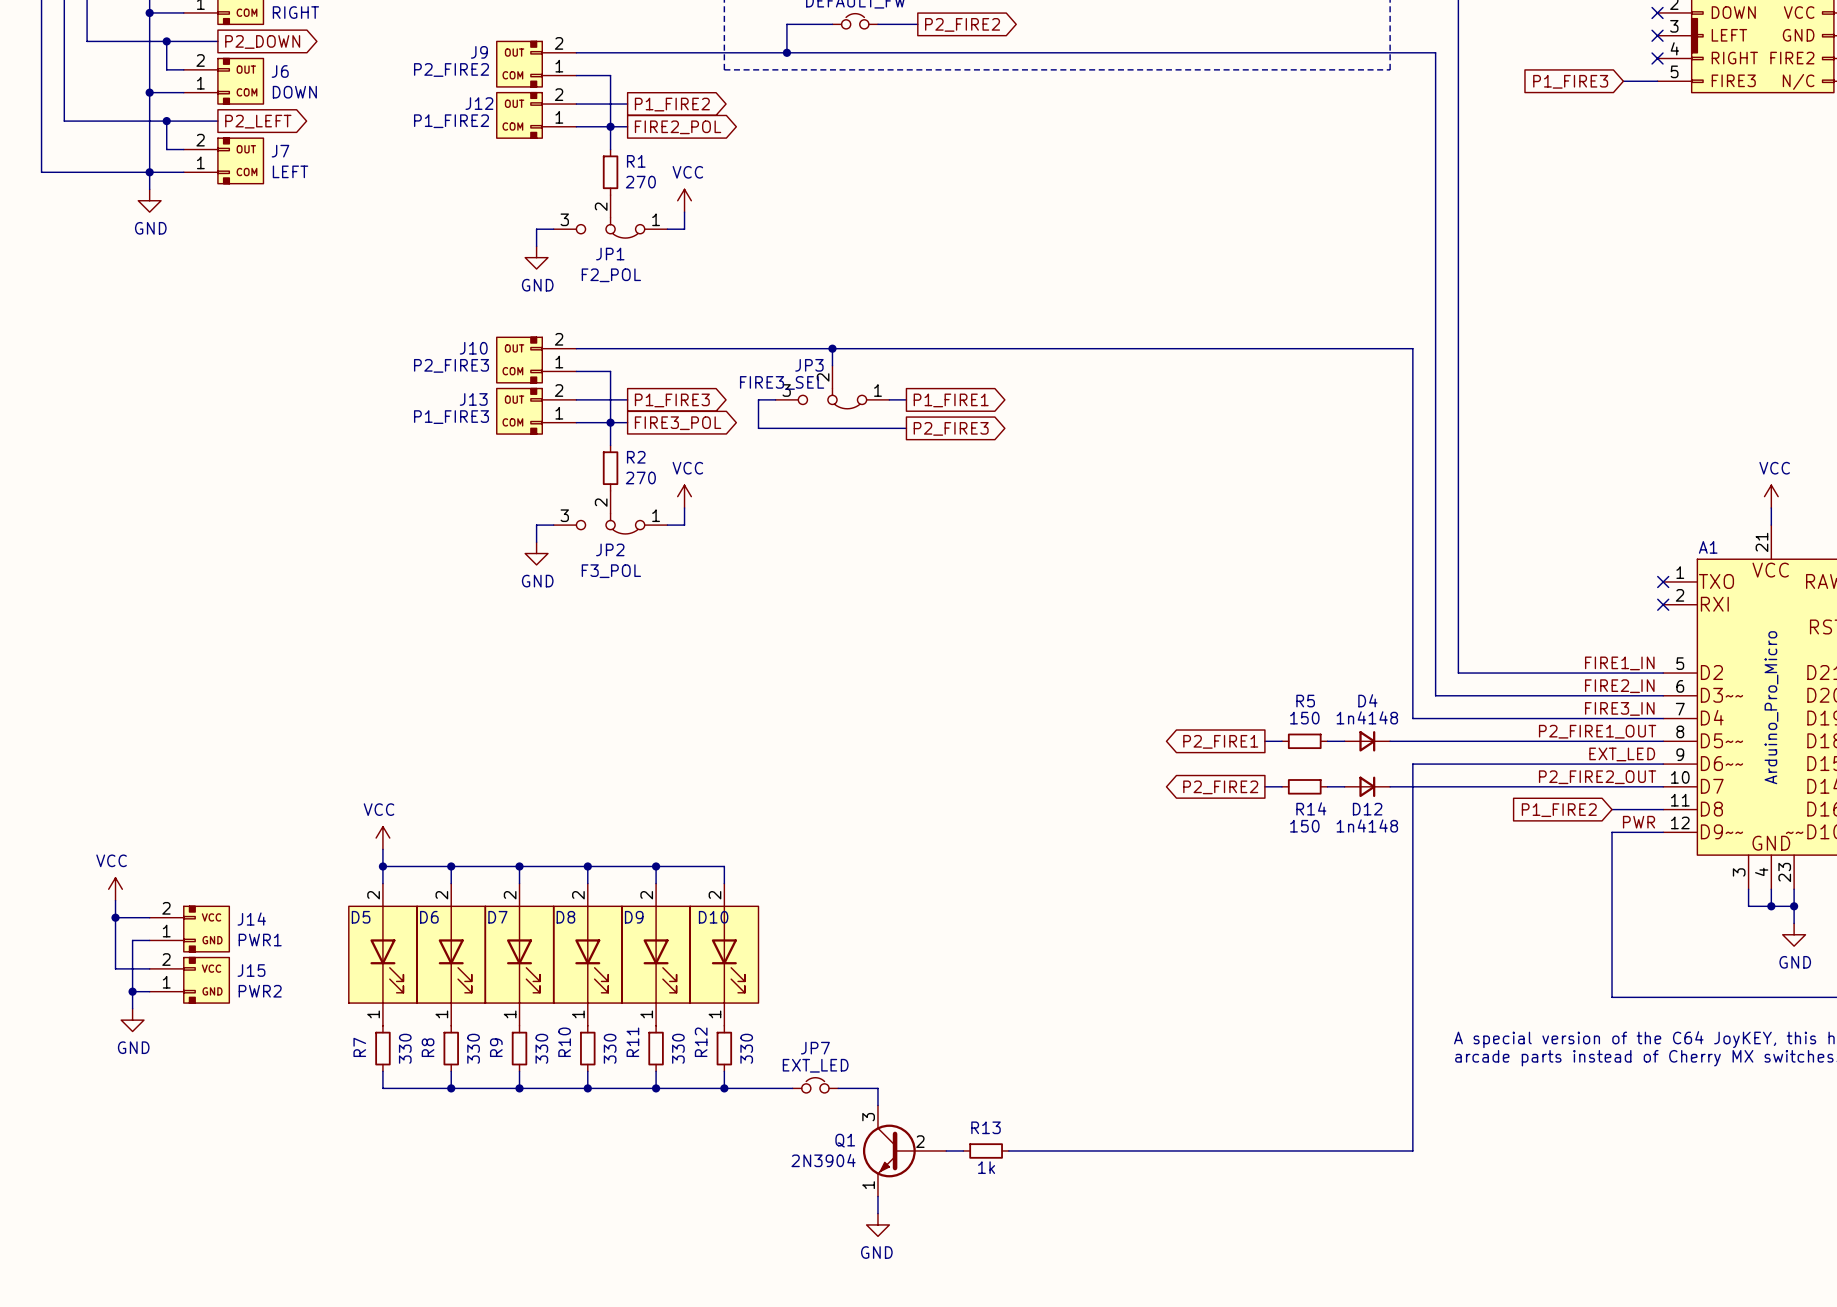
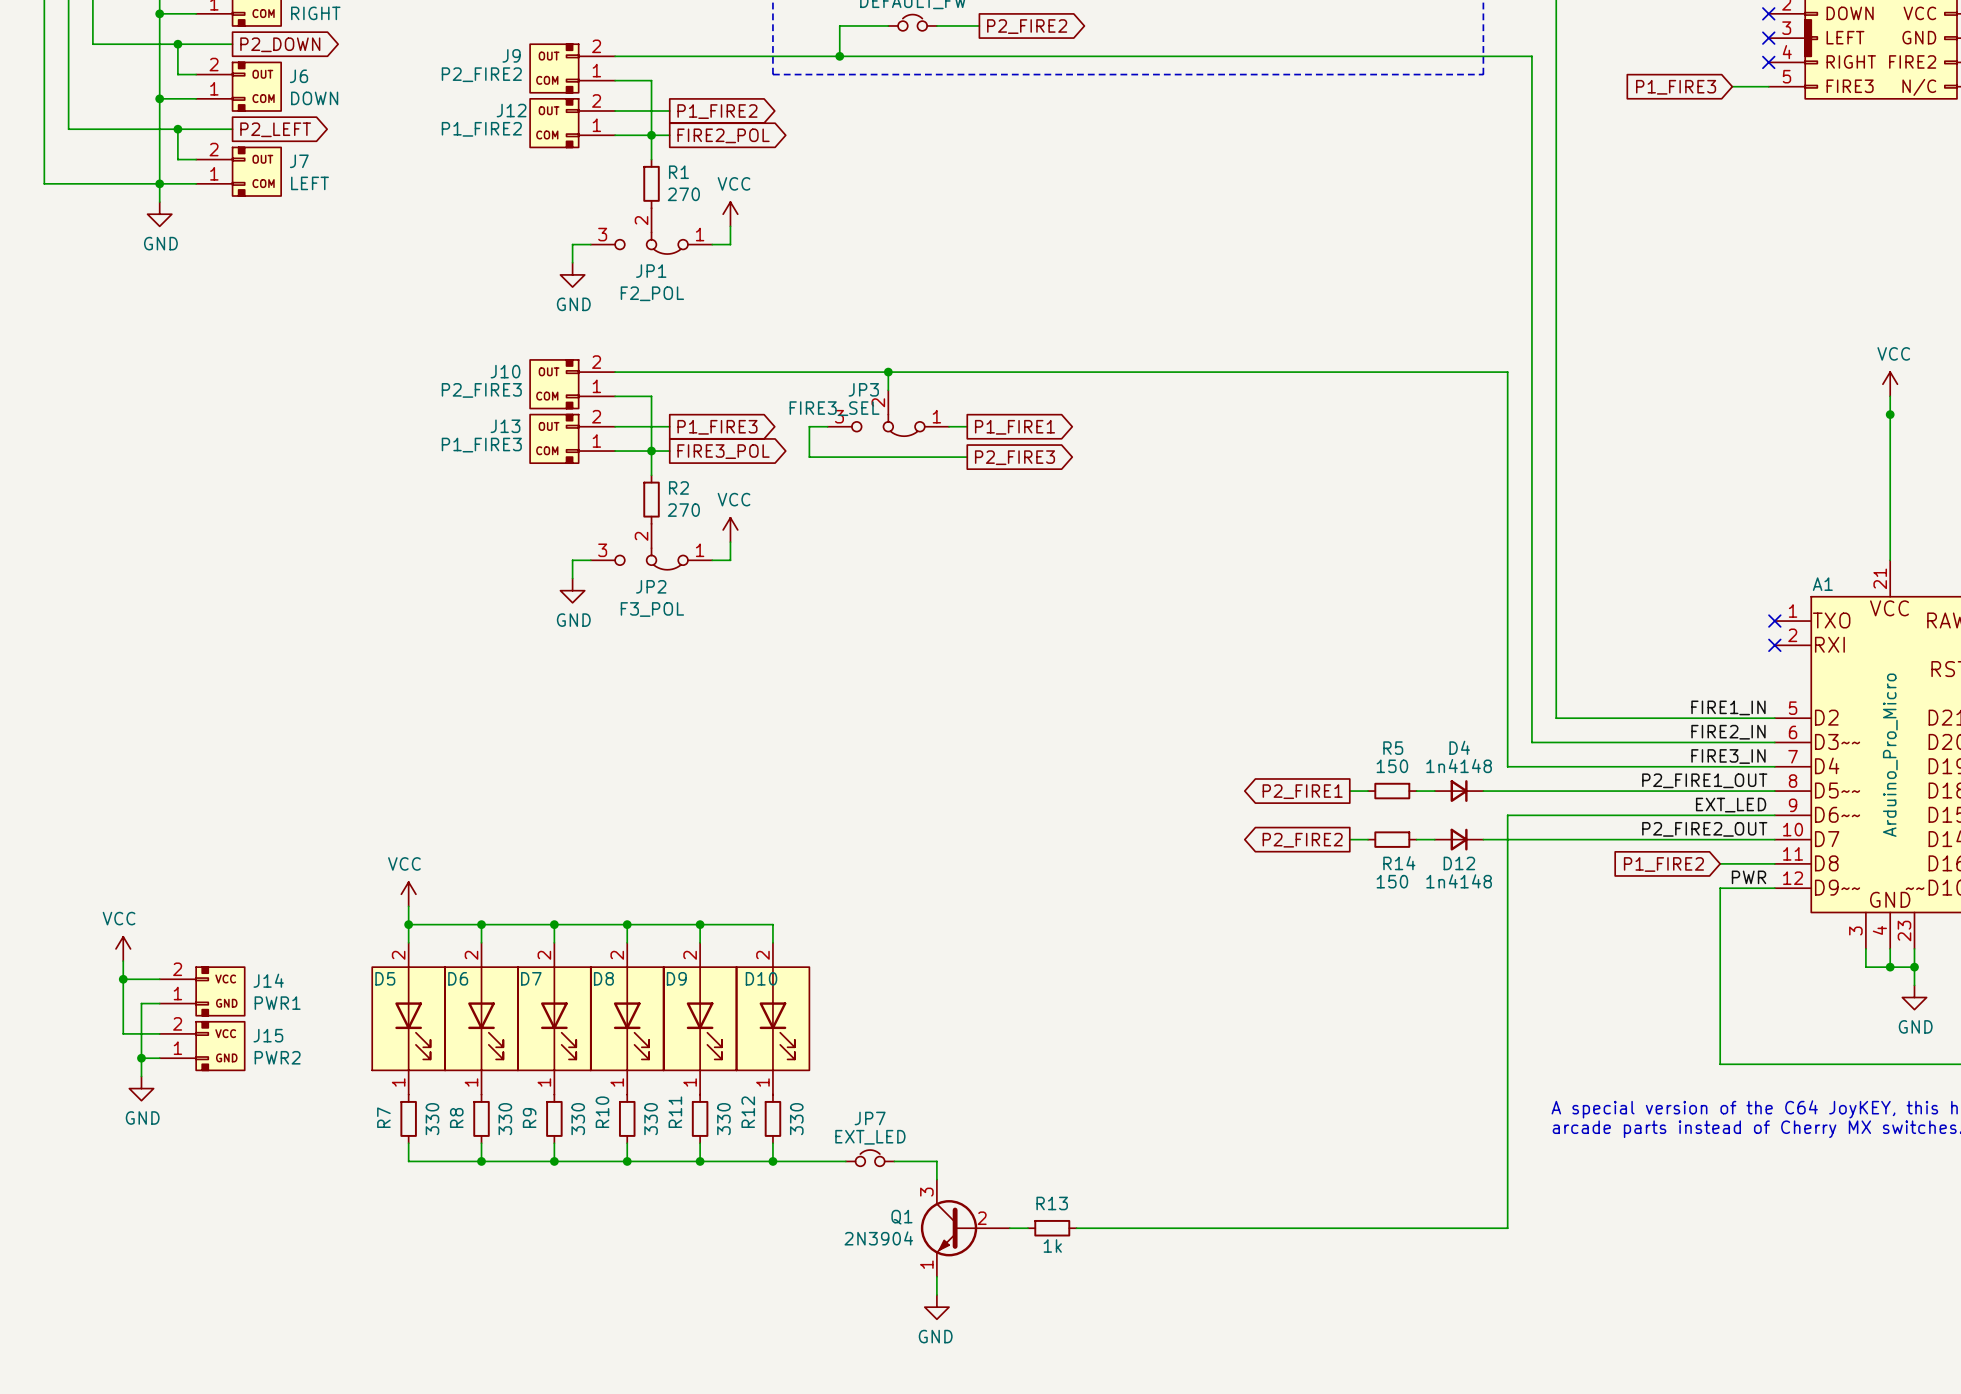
wire: none -> (1890, 396) (1890, 542)
junction: none -> (1890, 414)
power symbol position: VCC (1771, 496) -> VCC (1890, 384)

